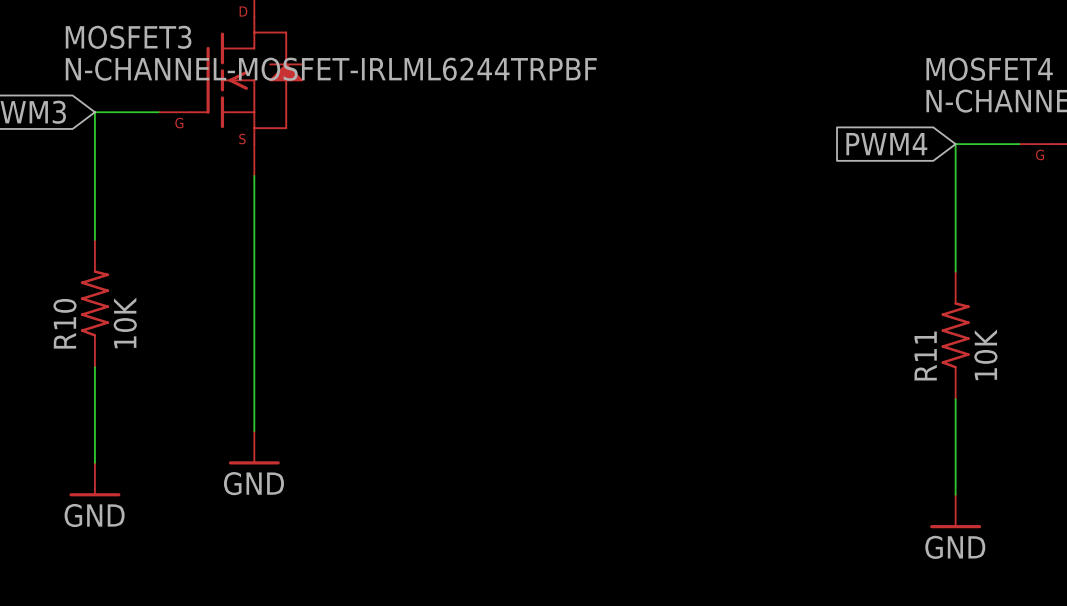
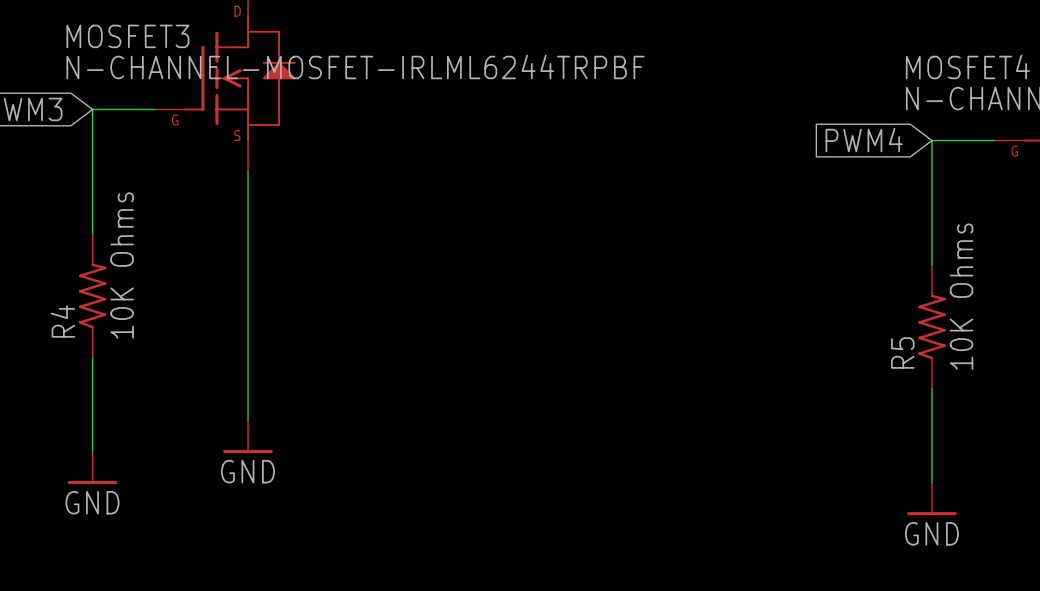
R10 value: 10K (125, 322) -> 10K Ohms (122, 265)
R10 name: R10 (64, 323) -> R4 (62, 321)
R11 value: 10K (985, 354) -> 10K Ohms (961, 296)
R11 name: R11 (925, 356) -> R5 (902, 352)

